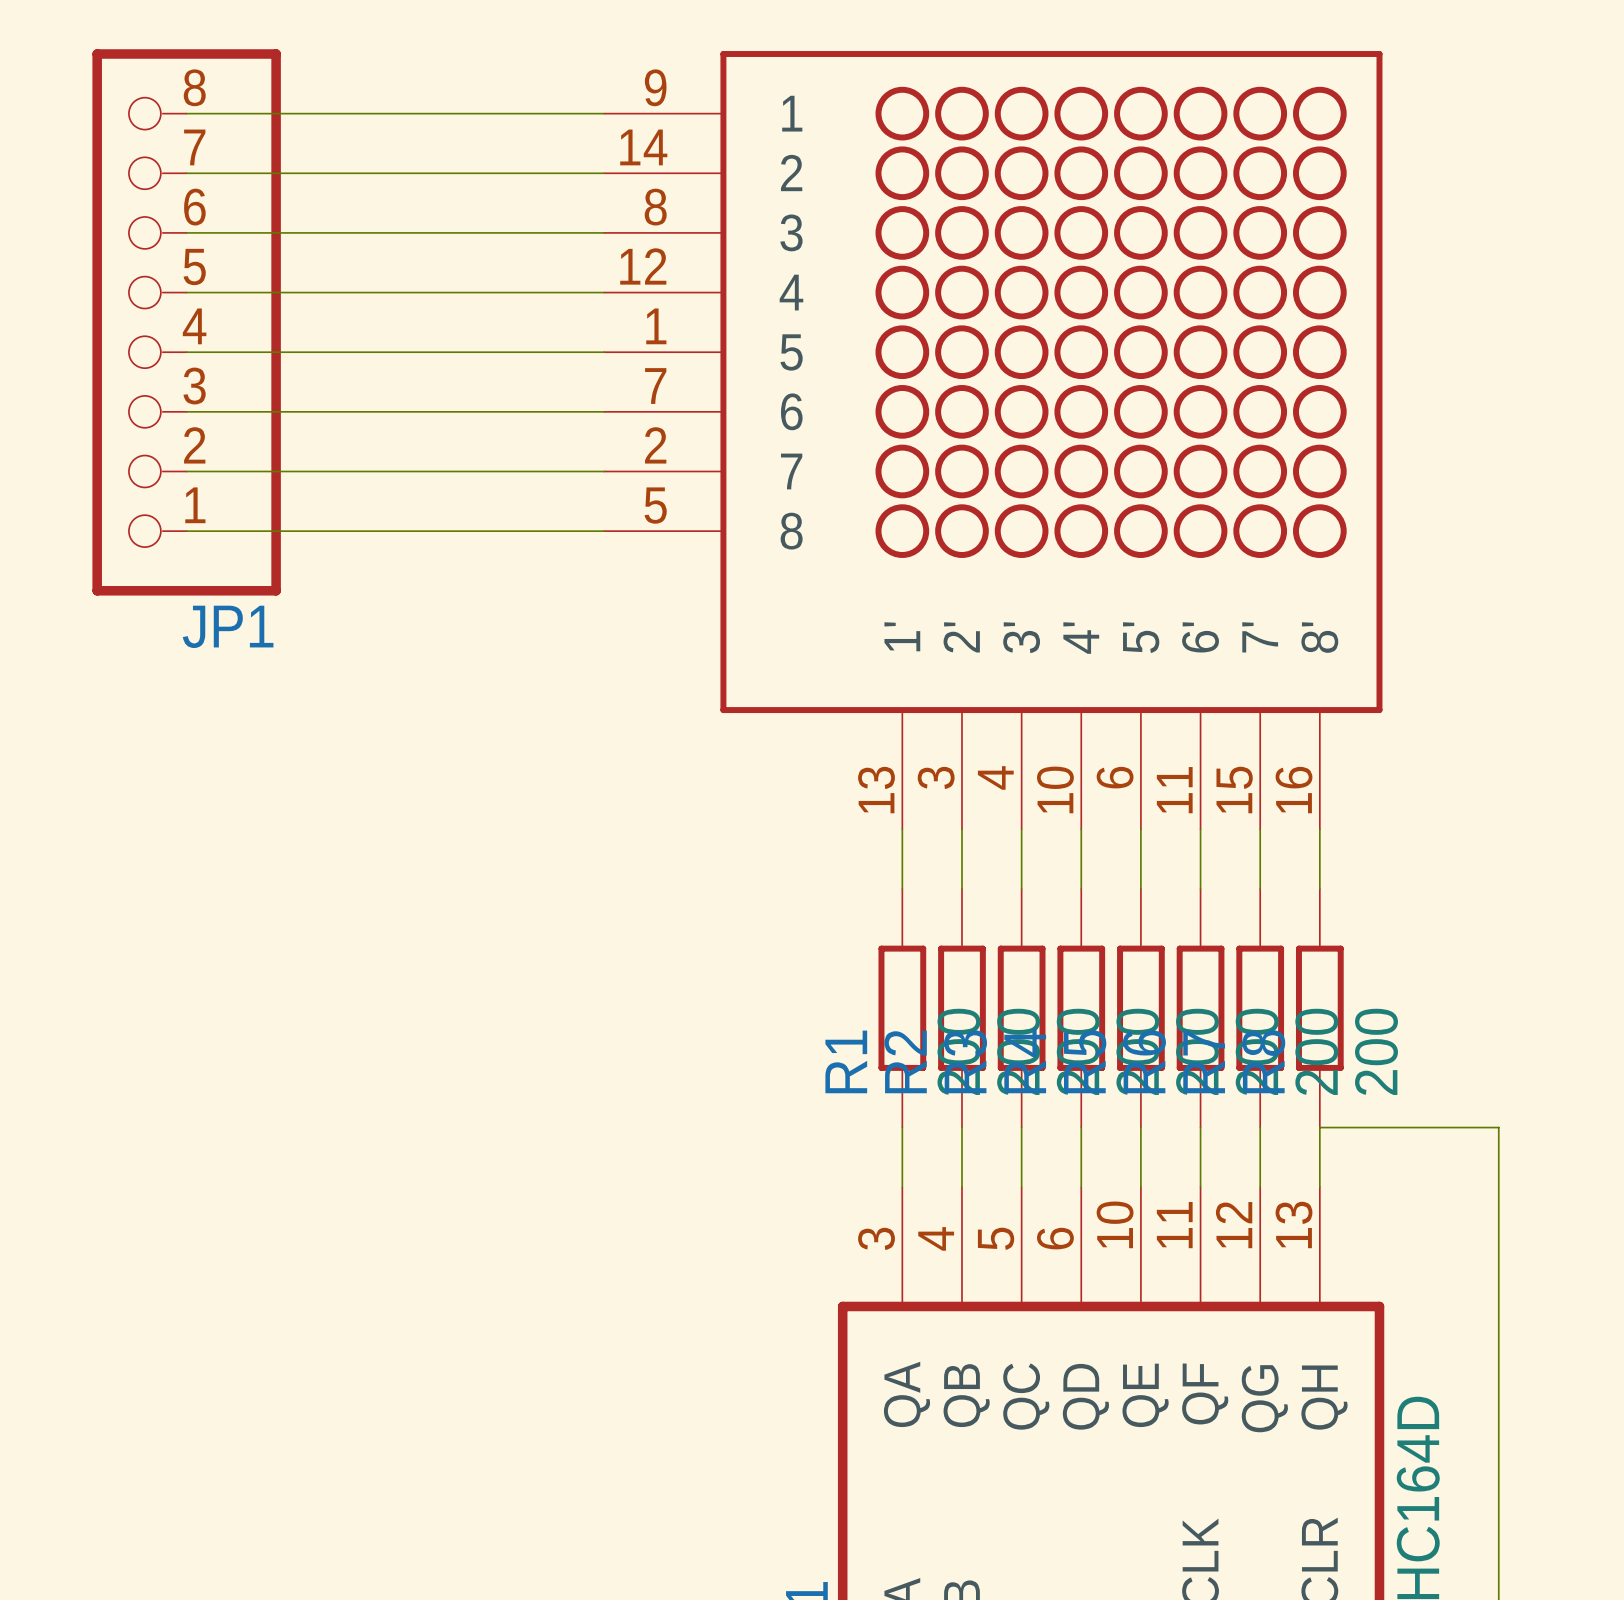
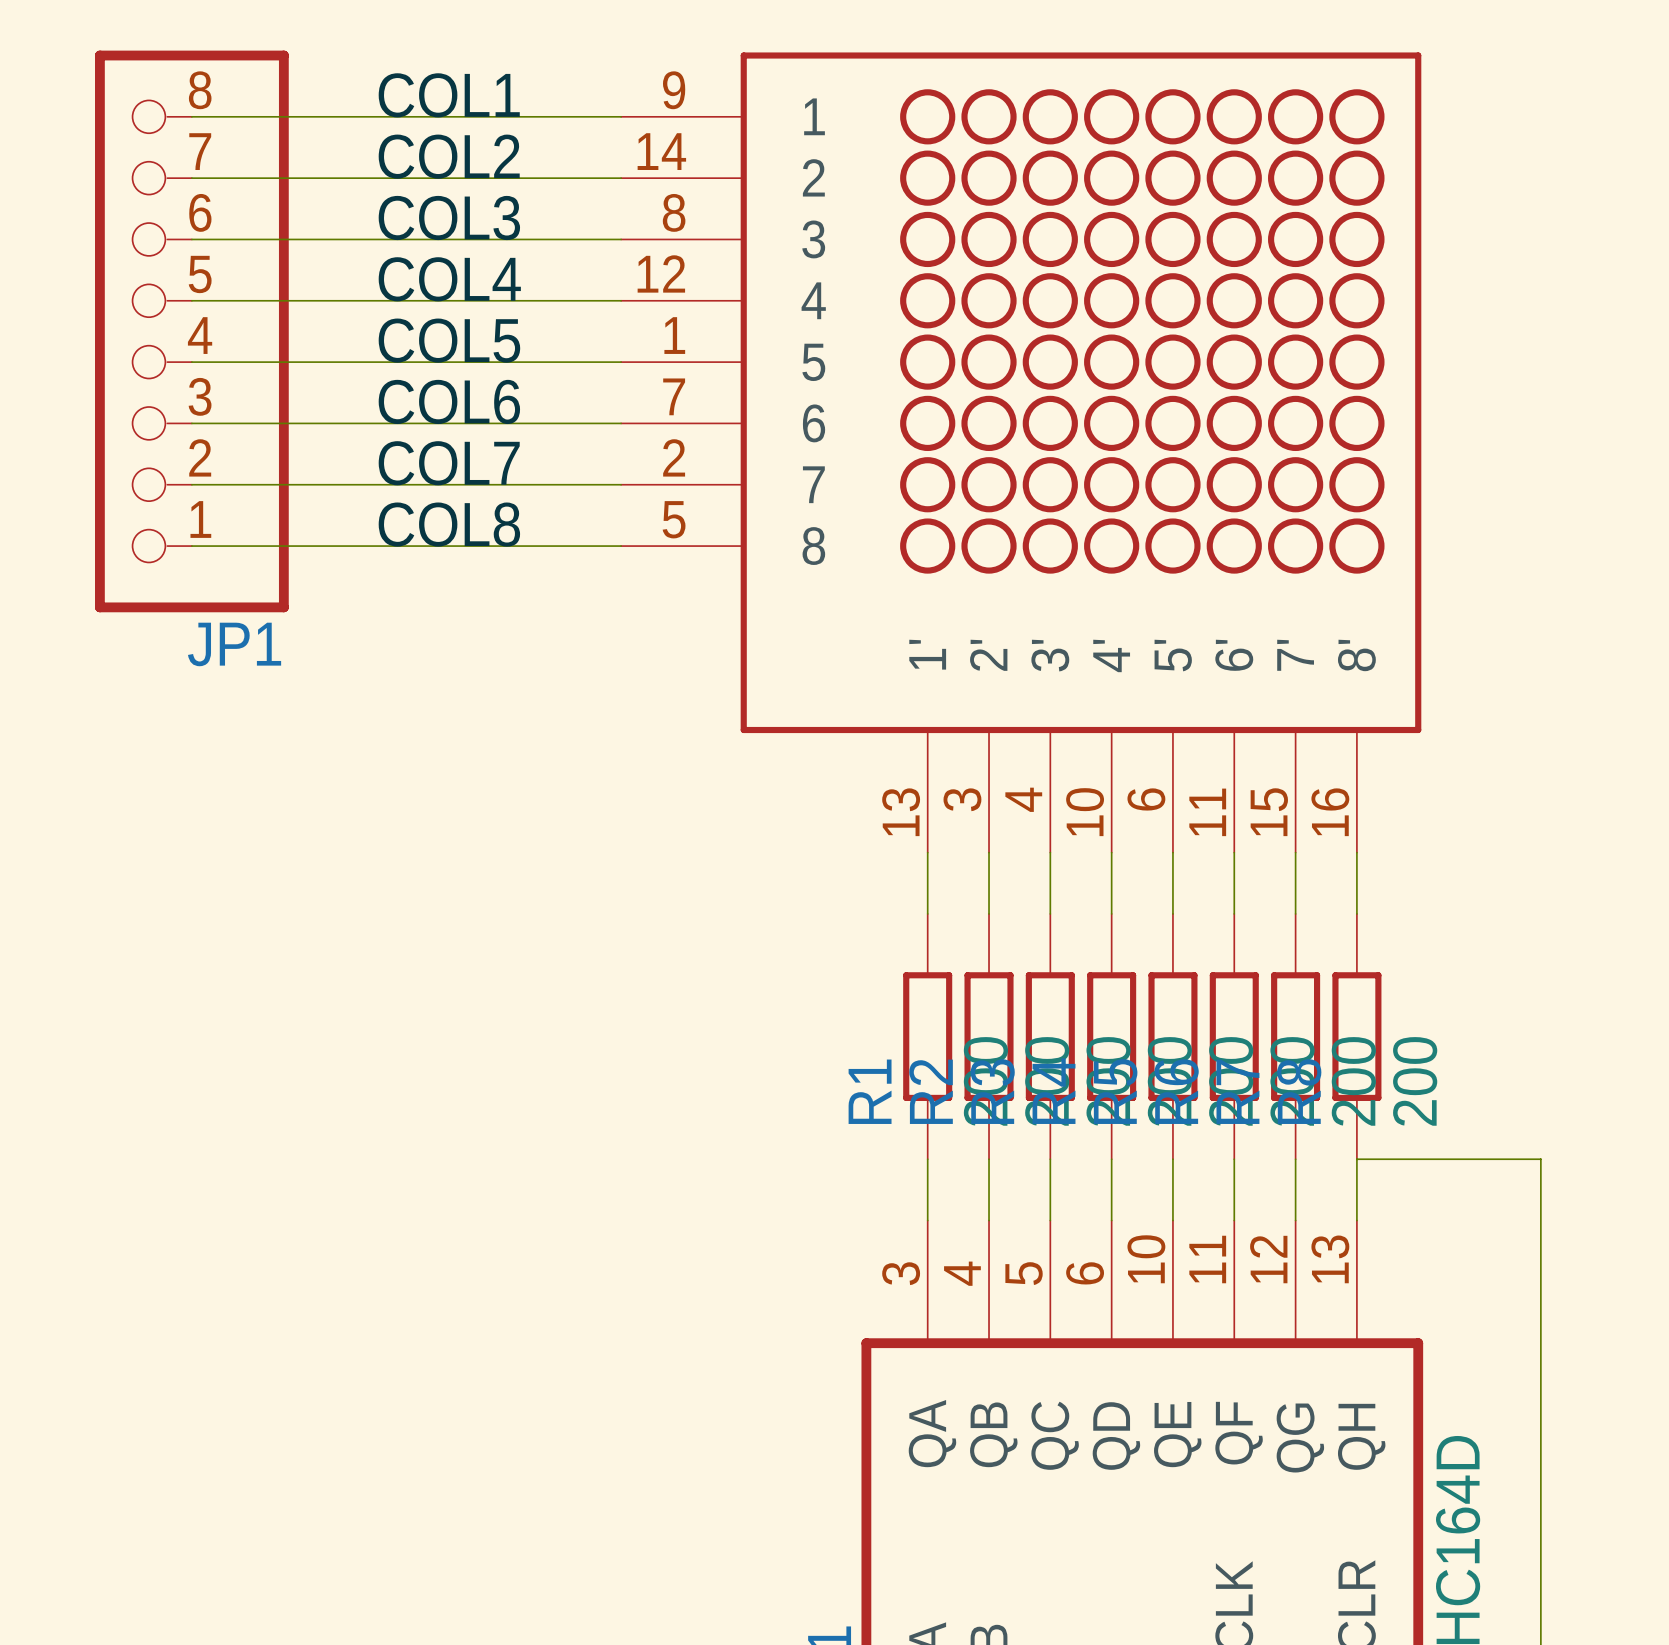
label: none -> COL1 (449, 95)
label: none -> COL2 (449, 156)
label: none -> COL3 (449, 217)
label: none -> COL4 (449, 279)
label: none -> COL5 (449, 340)
label: none -> COL6 (449, 401)
label: none -> COL7 (449, 463)
label: none -> COL8 (449, 524)

